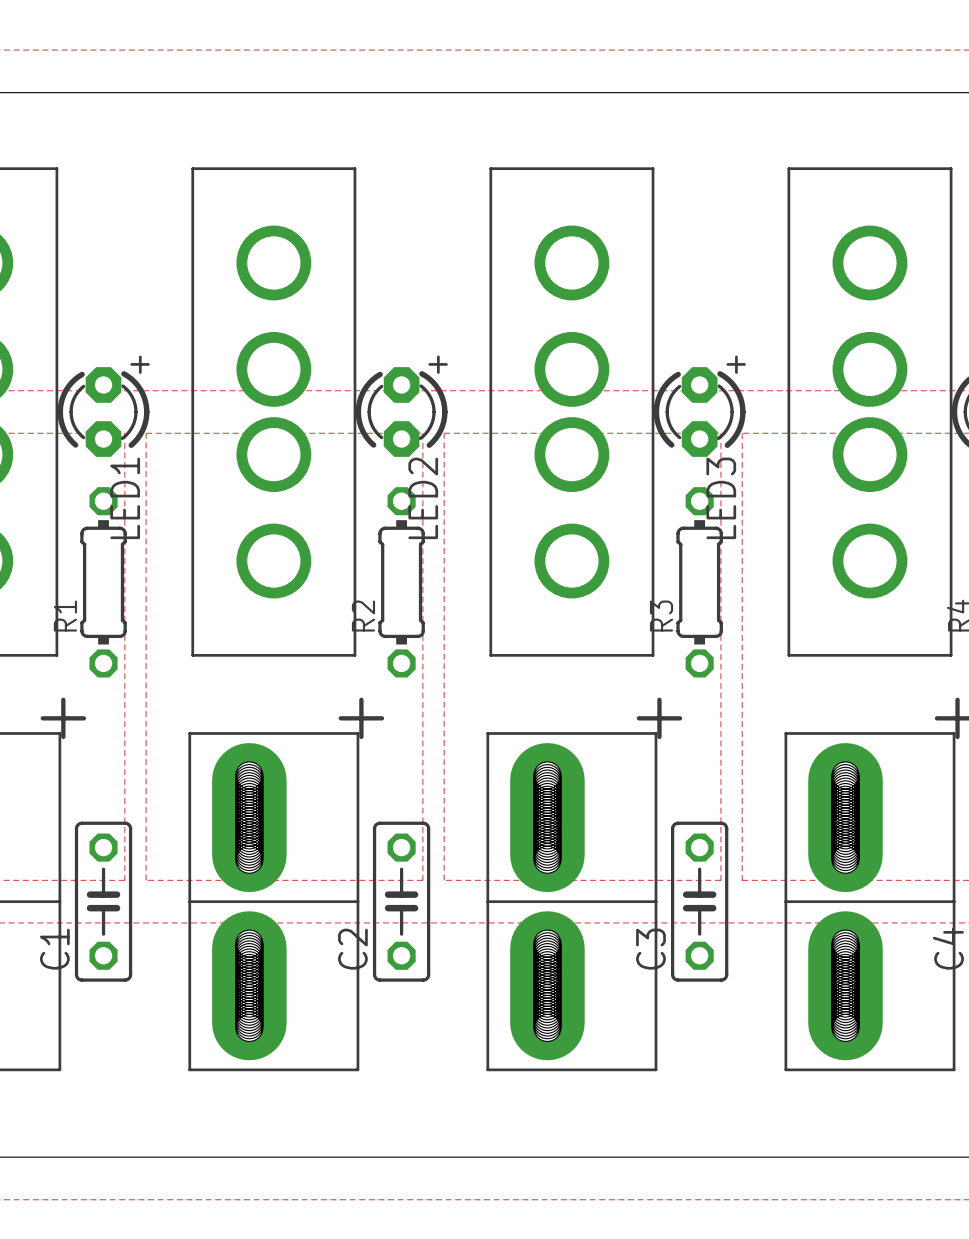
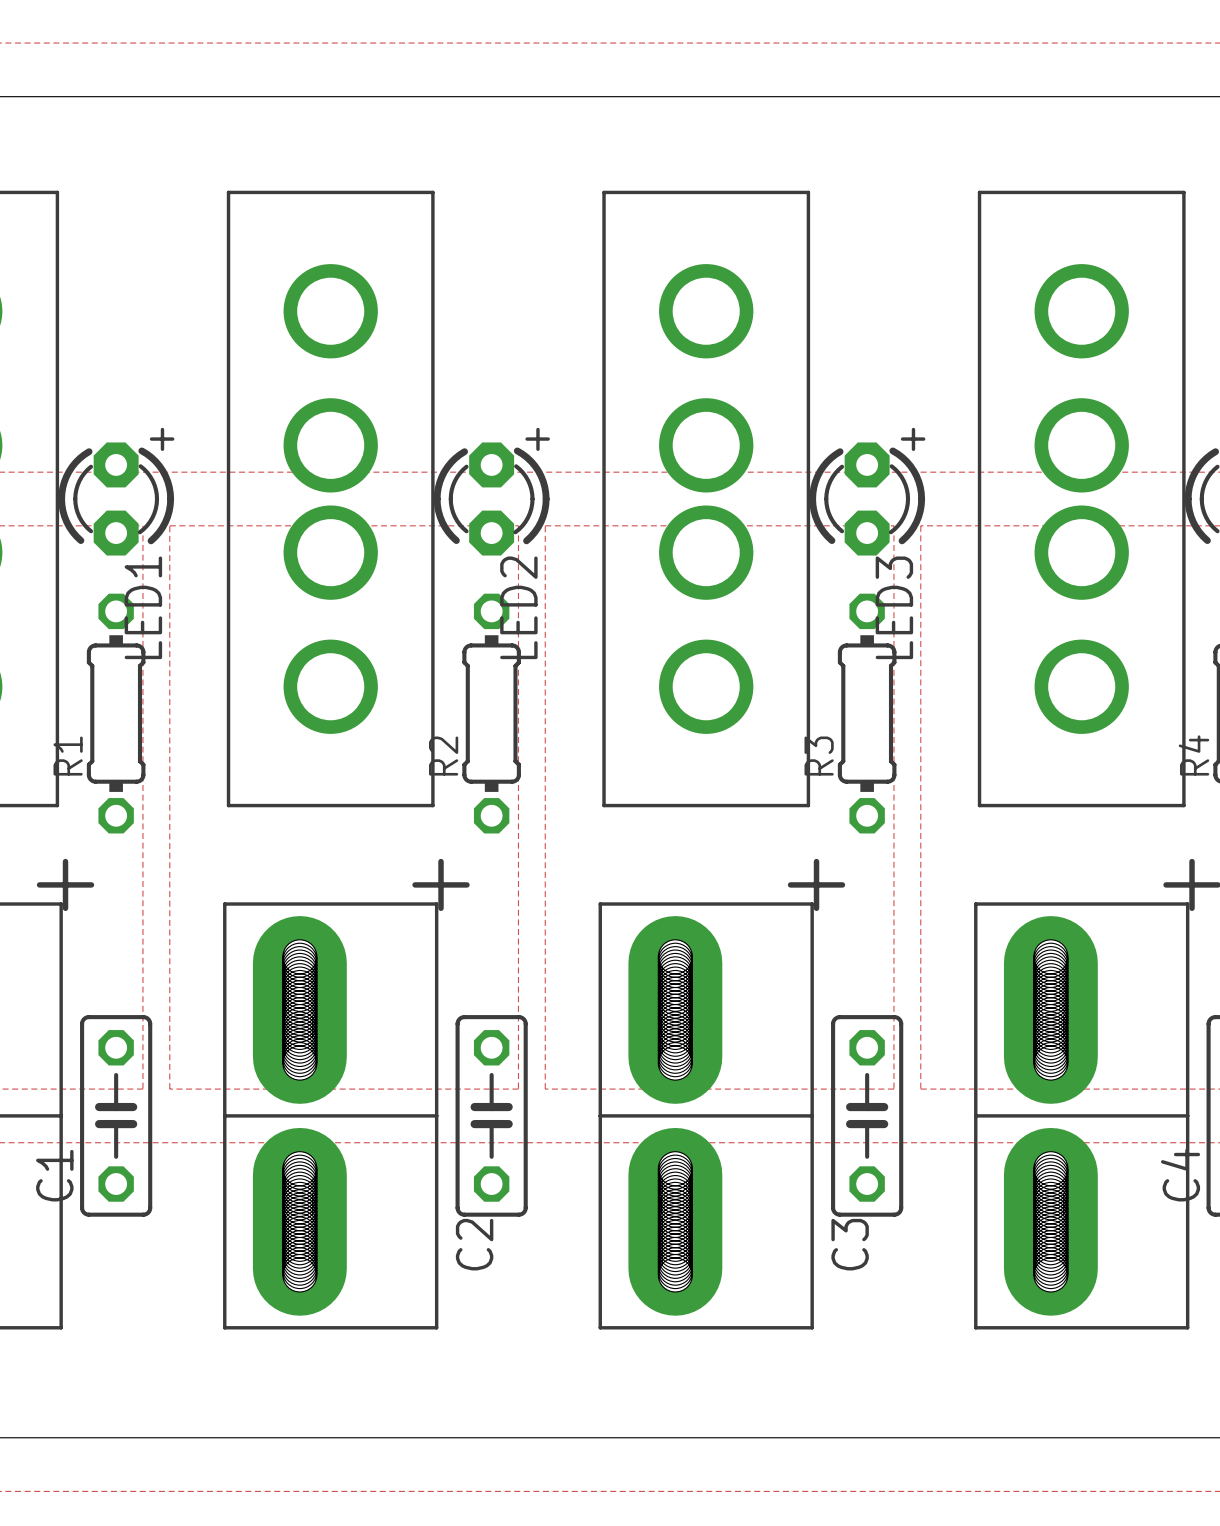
C2 name position: C2 (352, 949) -> C2 (474, 1244)
C3 name position: C3 (650, 949) -> C3 (850, 1244)

